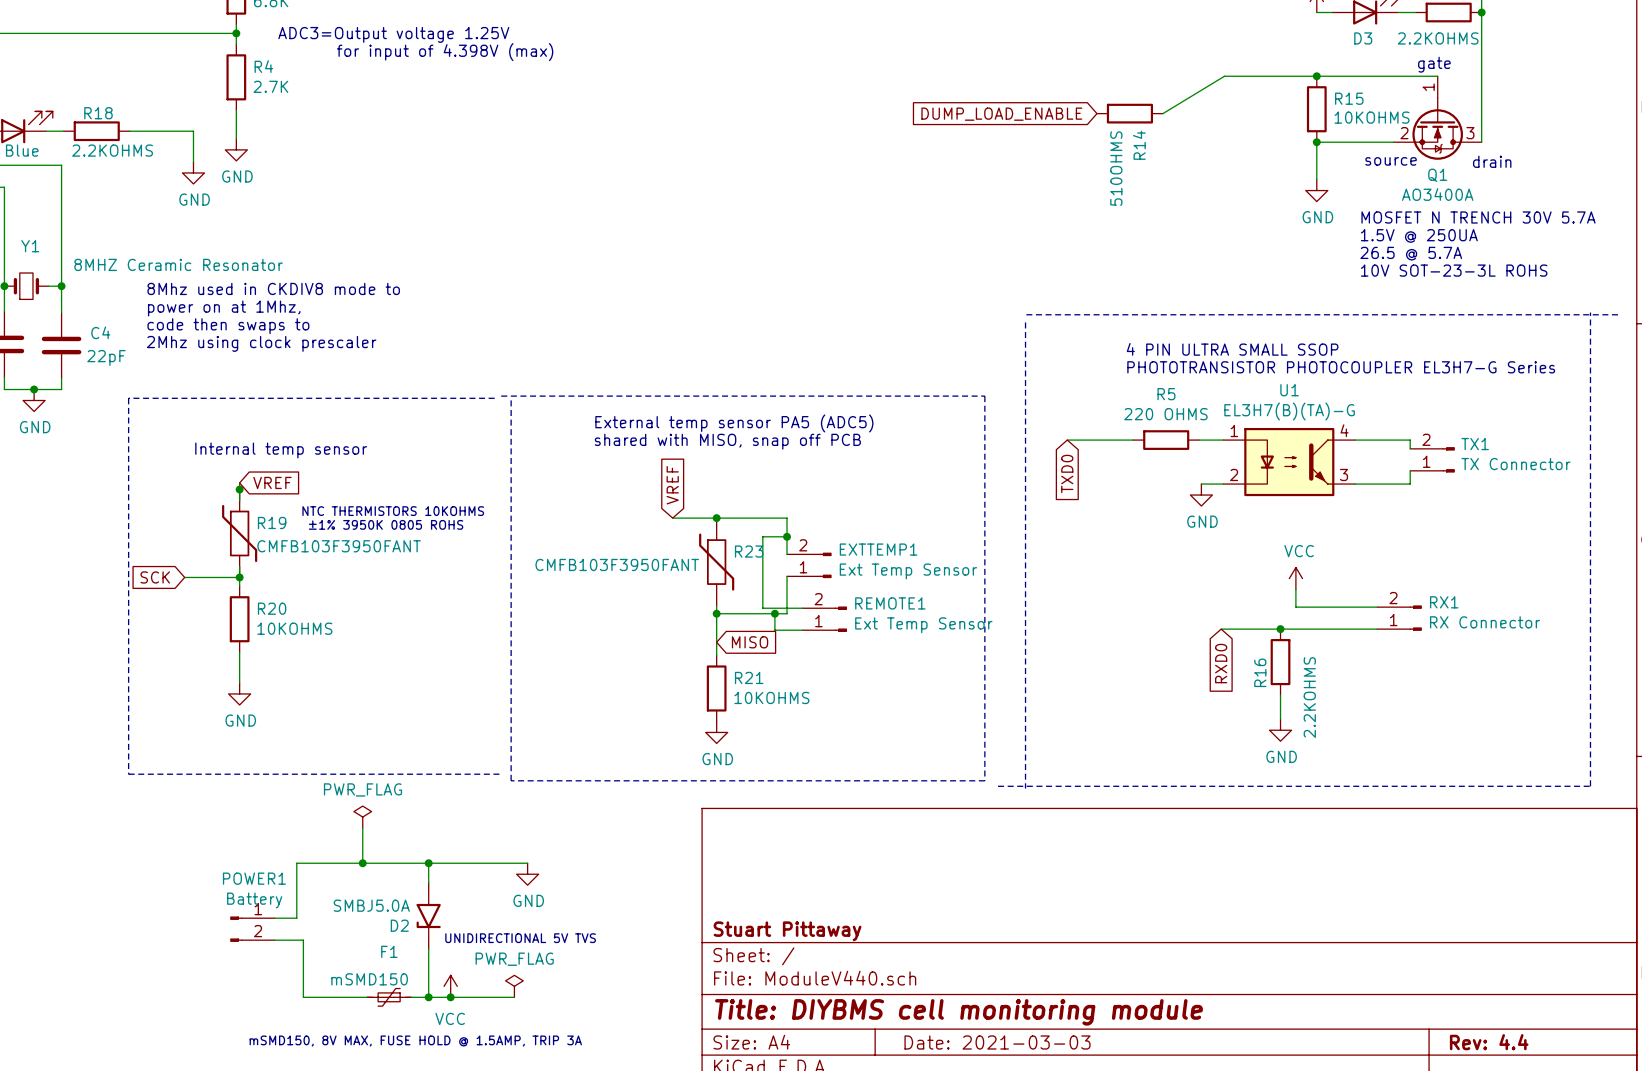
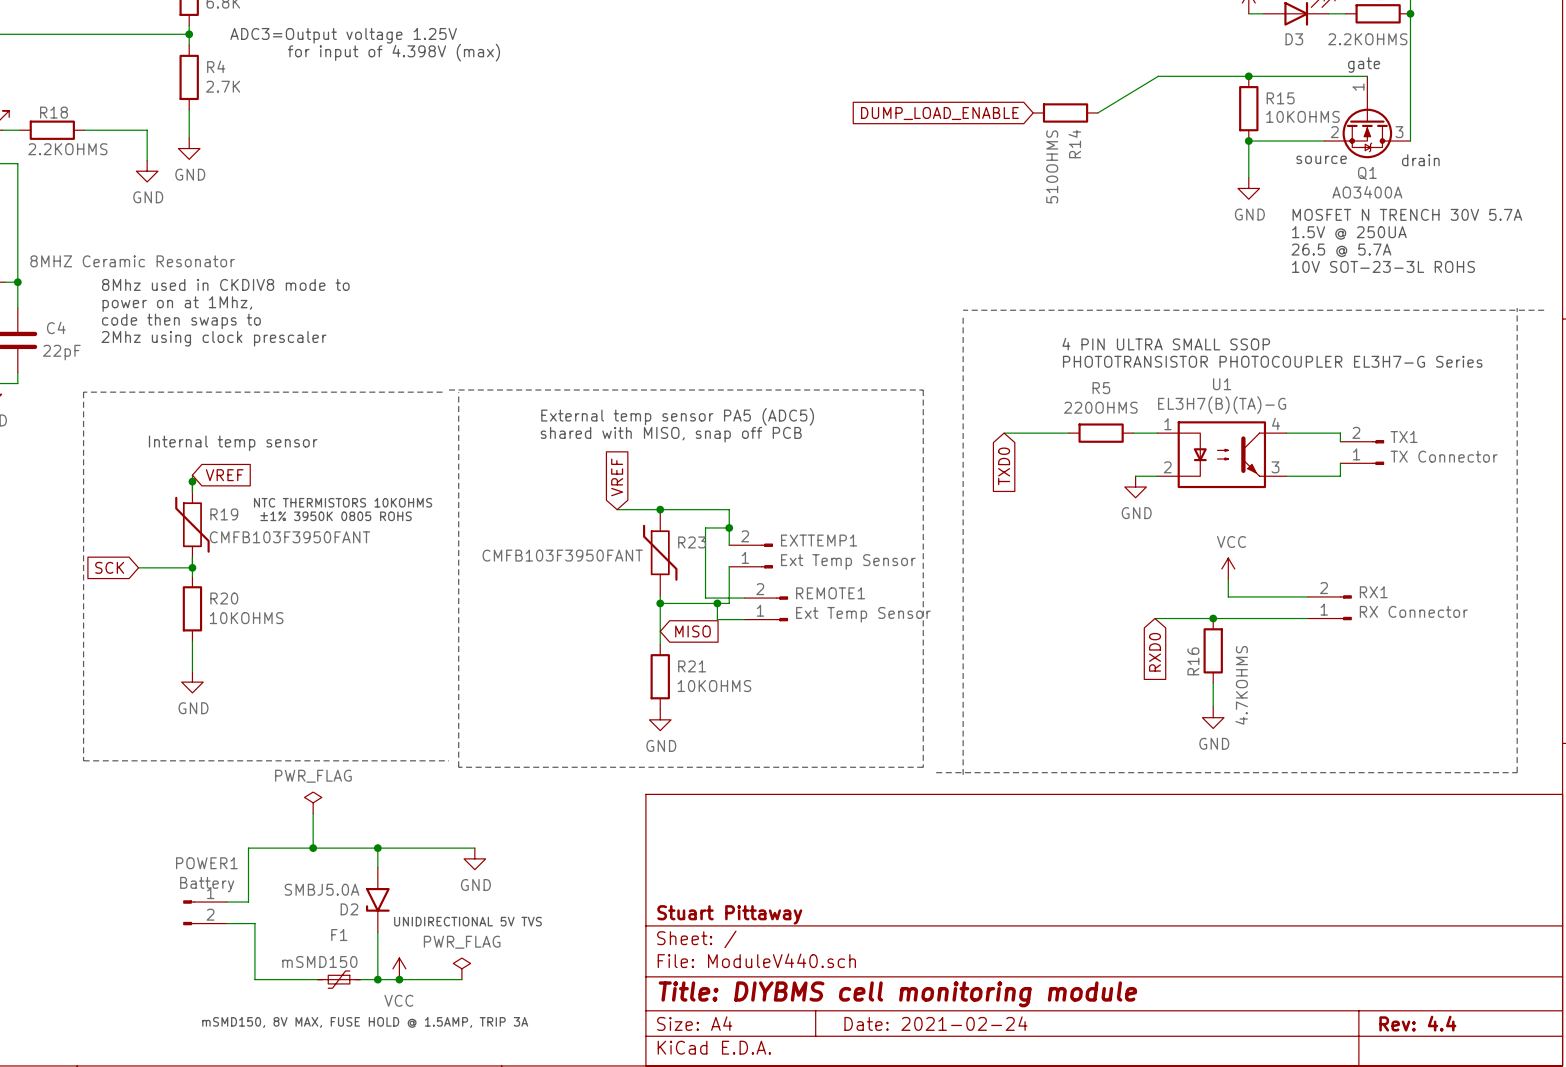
R5 value: 220 OHMS (1165, 414) -> 220OHMS (1100, 407)
R16 value: 2.2KOHMS (1309, 697) -> 4.7KOHMS (1241, 685)
title block: Date: 2021-03-03 (997, 1042) -> Date: 2021-02-24 (935, 1023)

